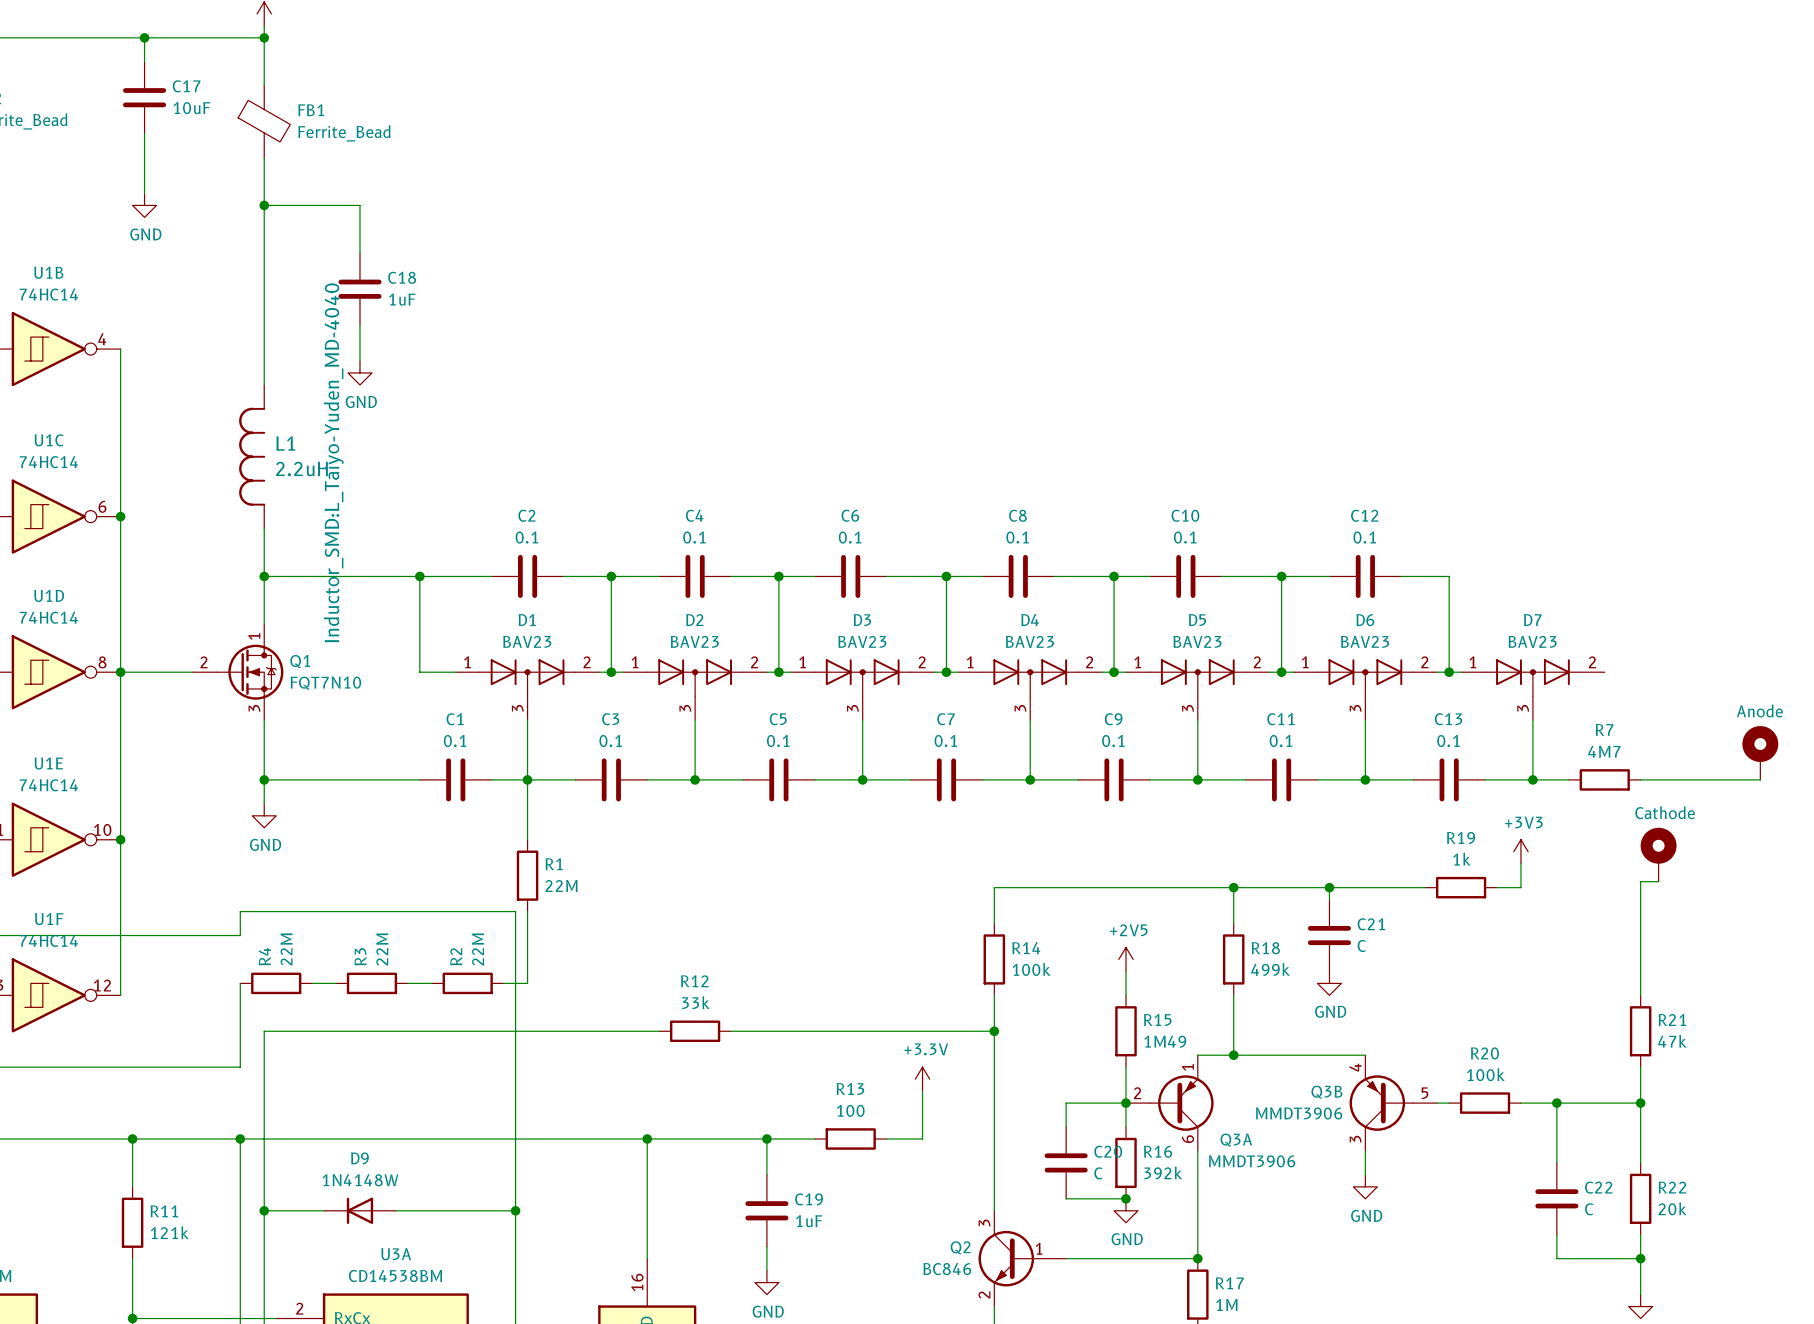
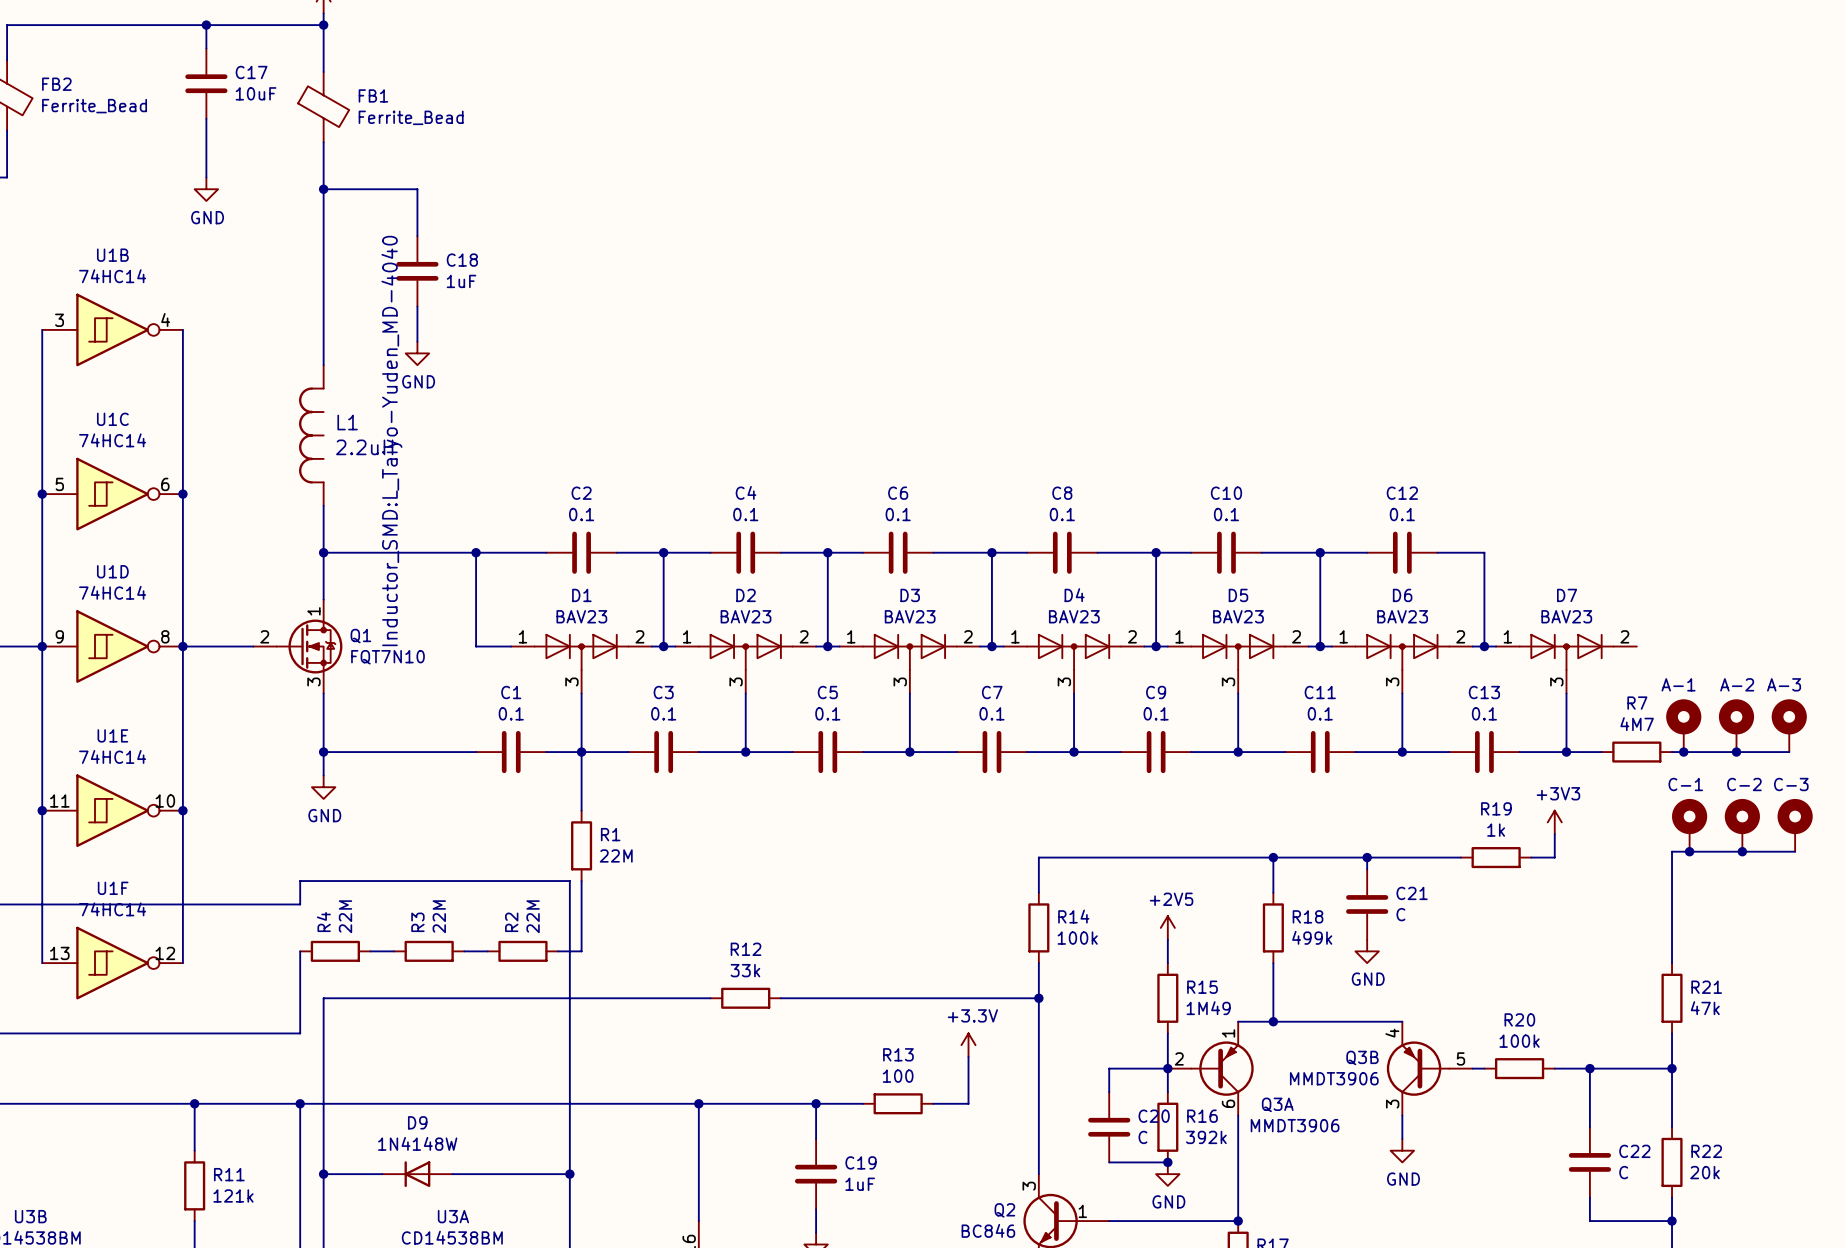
part value: Anode (1759, 710) -> A-3 (1784, 684)
part: none -> A-1 (1683, 725)
part: none -> A-2 (1736, 725)
junction: none -> (1683, 752)
junction: none -> (1736, 752)
part value: Cathode (1665, 812) -> C-1 (1685, 784)
part: none -> C-2 (1742, 825)
part: none -> C-3 (1795, 825)
wire: none -> (1689, 851) (1795, 851)
junction: none -> (1689, 851)
junction: none -> (1742, 851)

